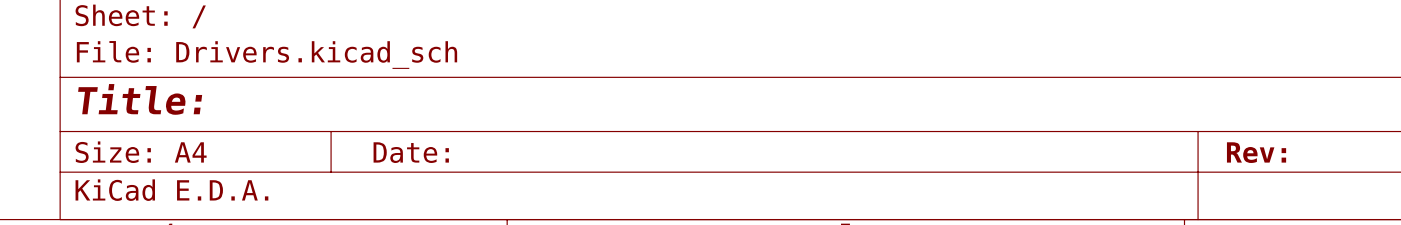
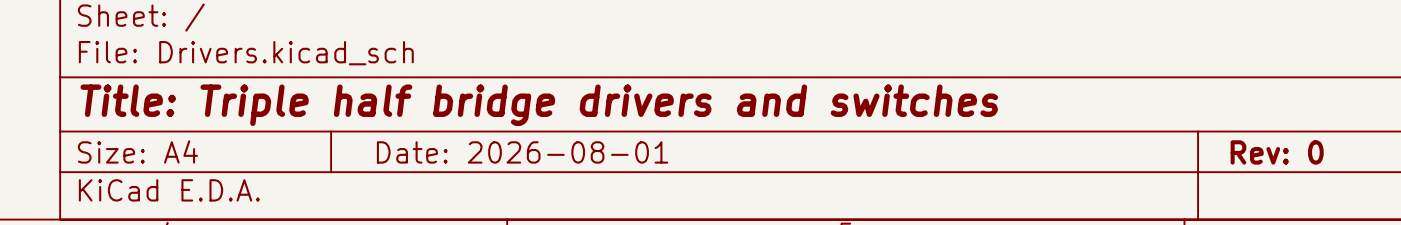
title block: Title: (140, 99) -> Title: Triple half bridge drivers and switches (539, 105)
title block: Date: (411, 152) -> Date: 2026-08-01 (522, 152)
title block: Rev: (1256, 152) -> Rev: 0 (1277, 152)

